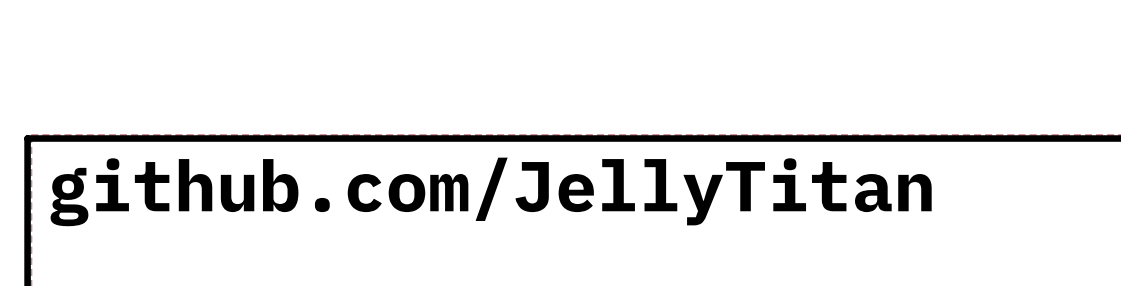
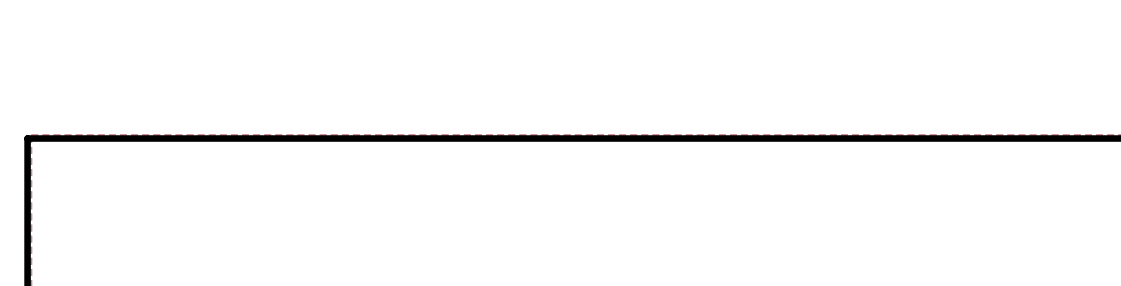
text: github.com/JellyTitan (491, 191) -> none

